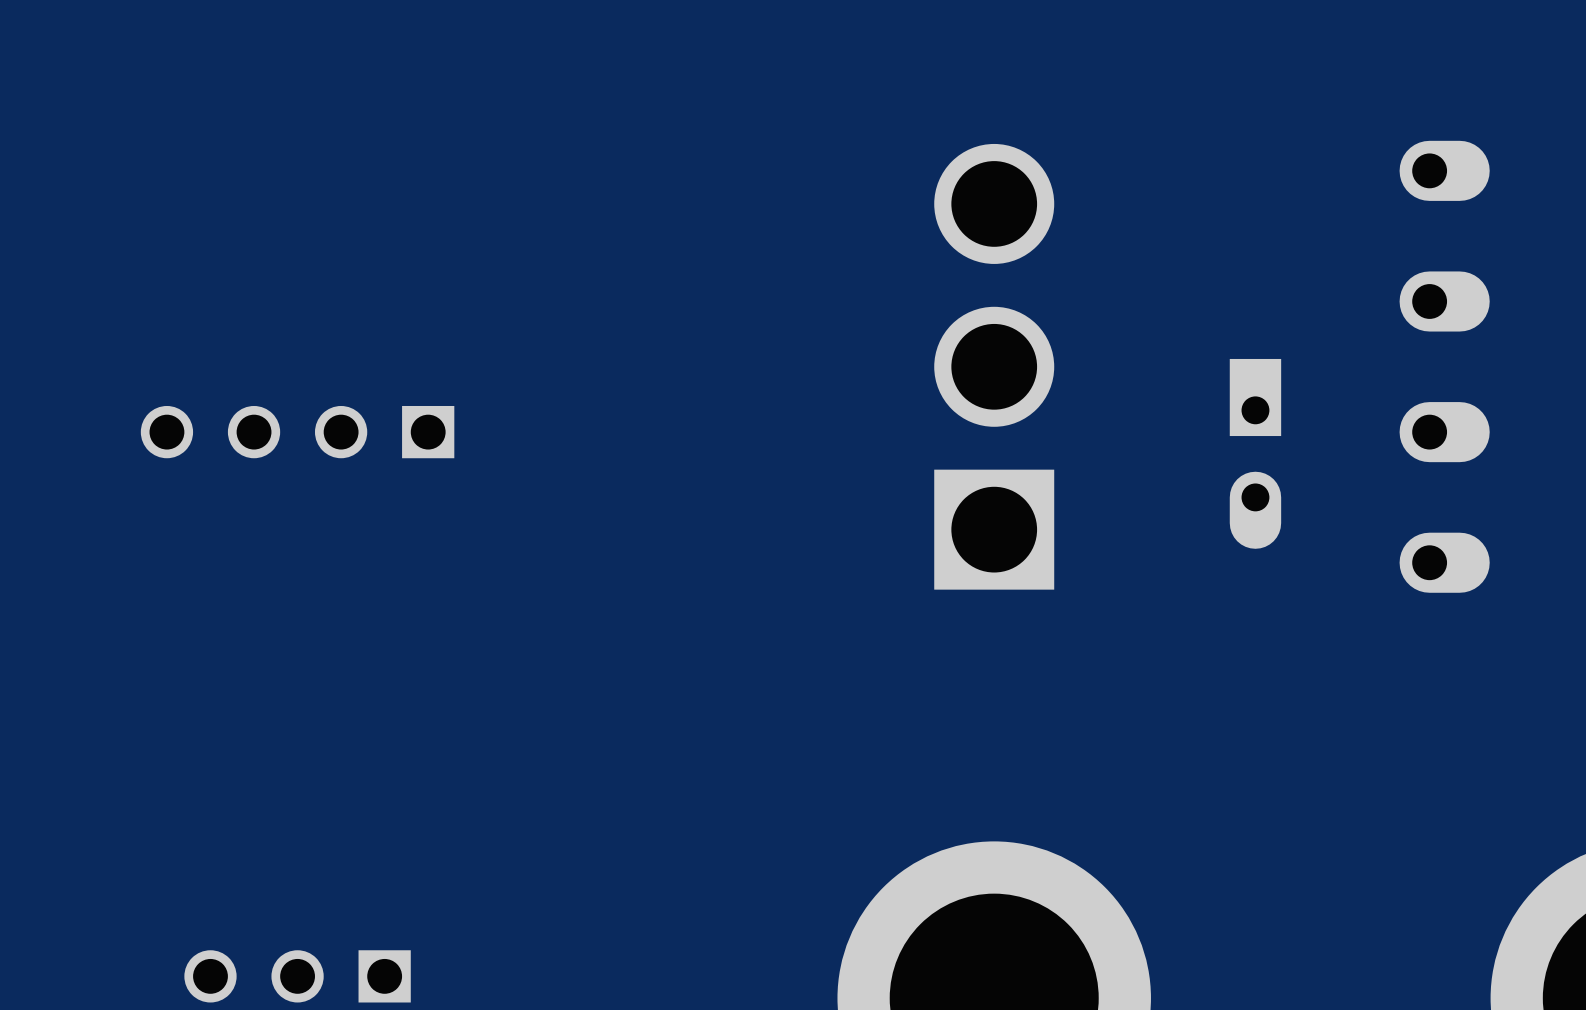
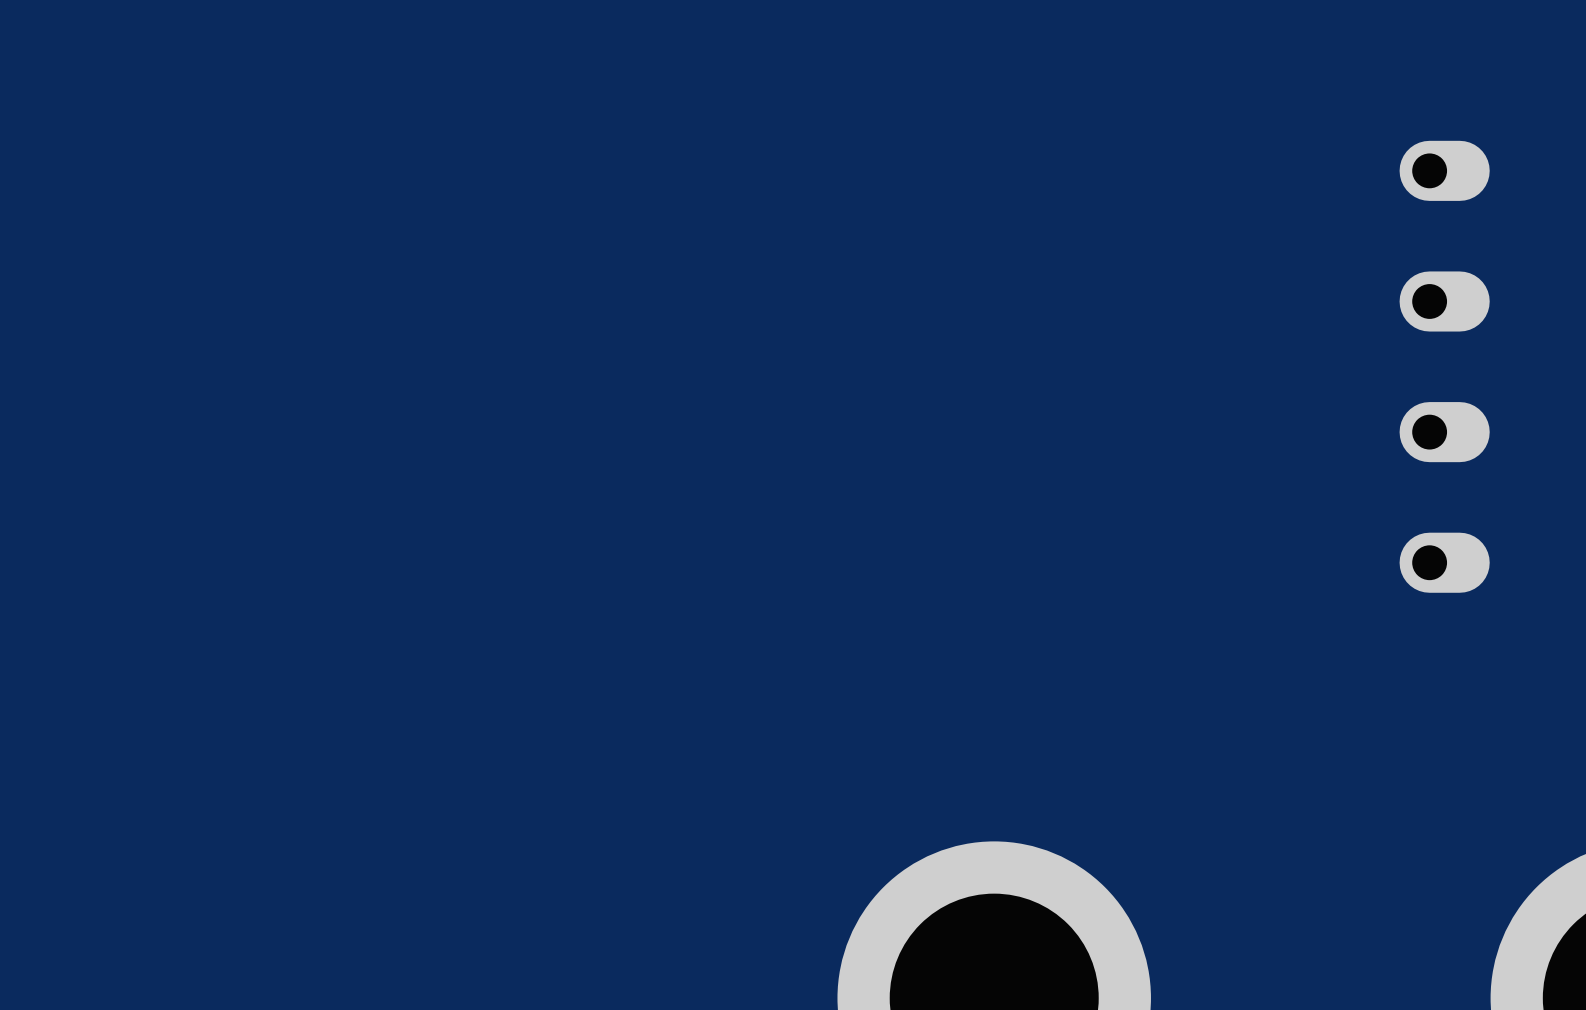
part: (994, 366) -> none
part: (297, 432) -> none
part: (1255, 453) -> none
part: (297, 976) -> none

